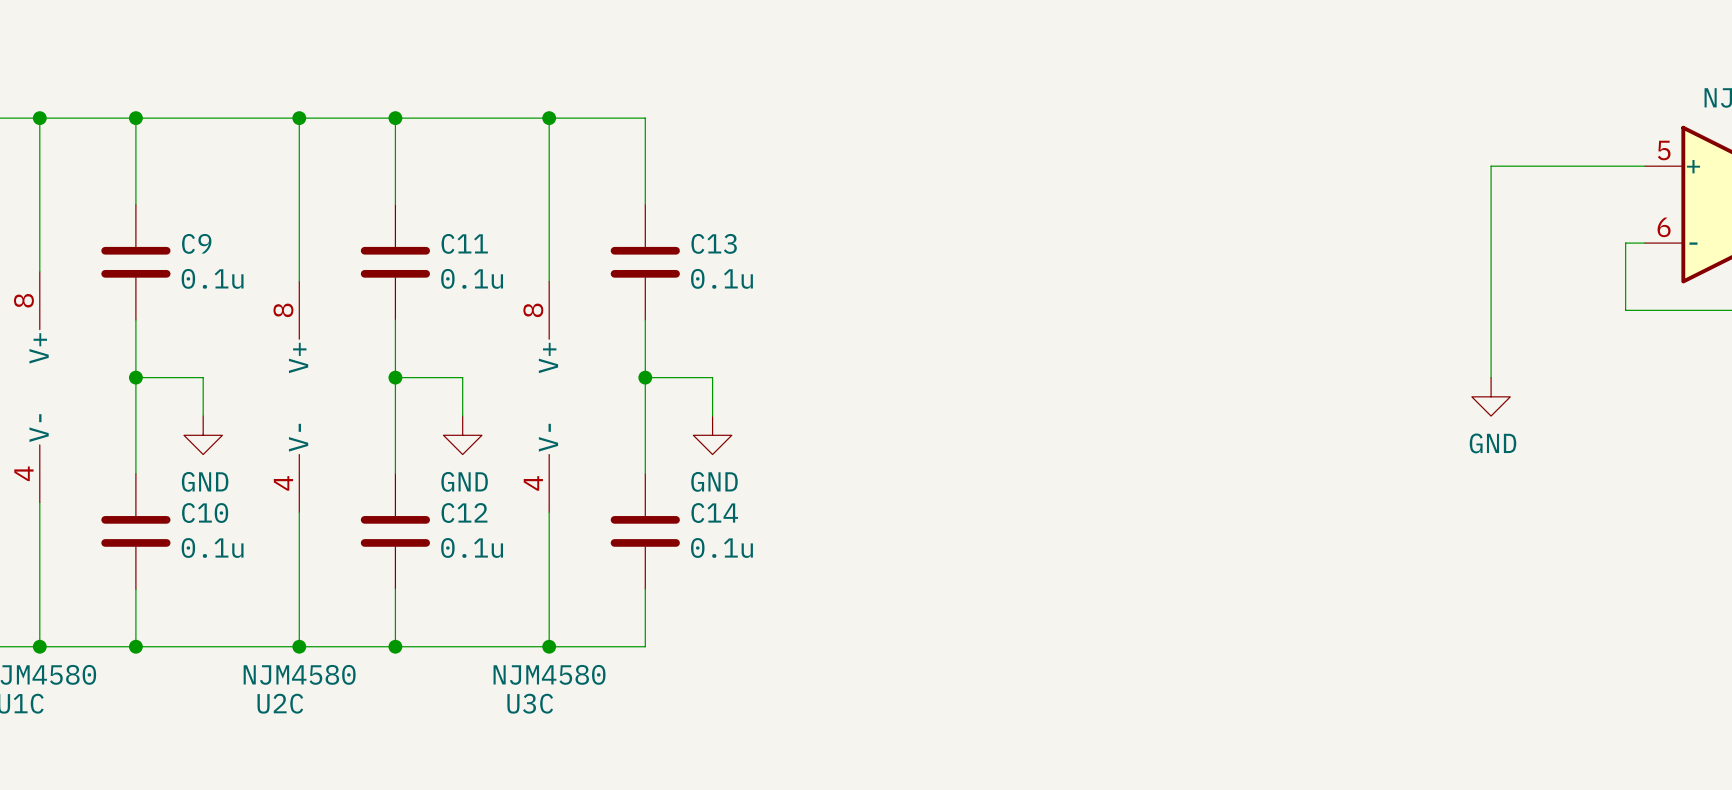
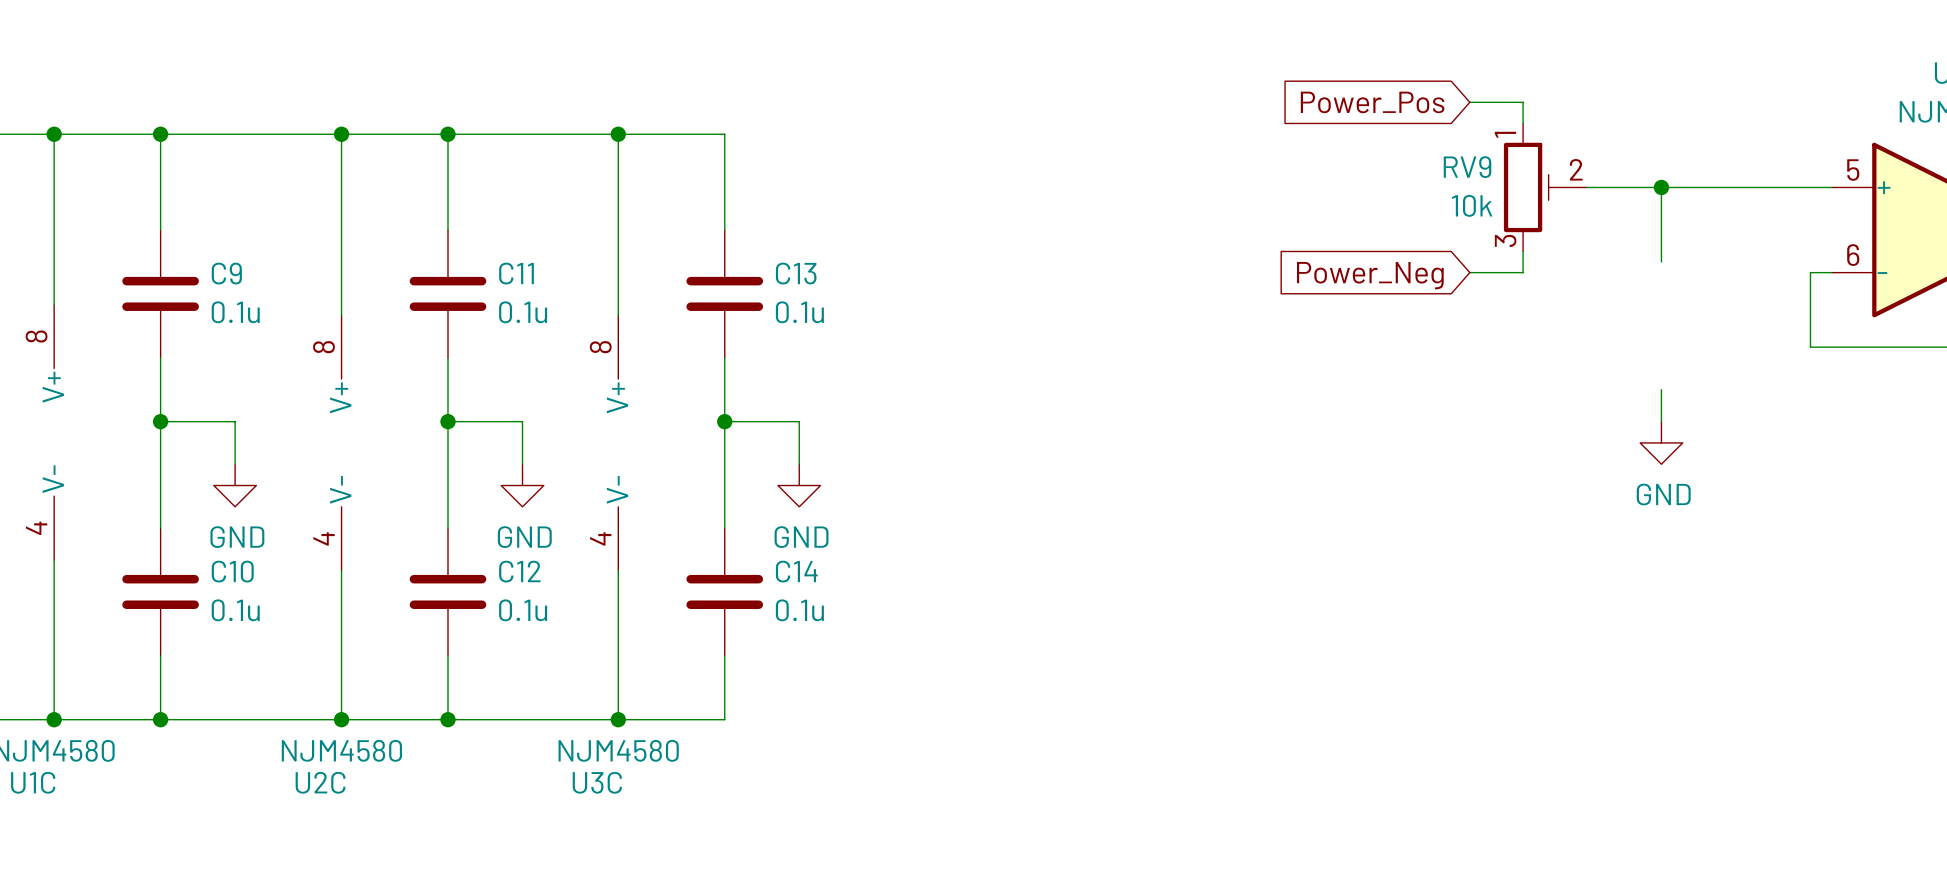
wire: none -> (1469, 102) (1523, 102) (1523, 123)
global label: none -> Power_Pos (1372, 102)
RV9: none -> 10k (1545, 187)
wire: none -> (1586, 187) (1661, 187)
junction: none -> (1661, 187)
wire: none -> (1523, 251) (1523, 272) (1469, 272)
wire: (1491, 233) (1491, 348) -> none
global label: none -> Power_Neg (1370, 275)

